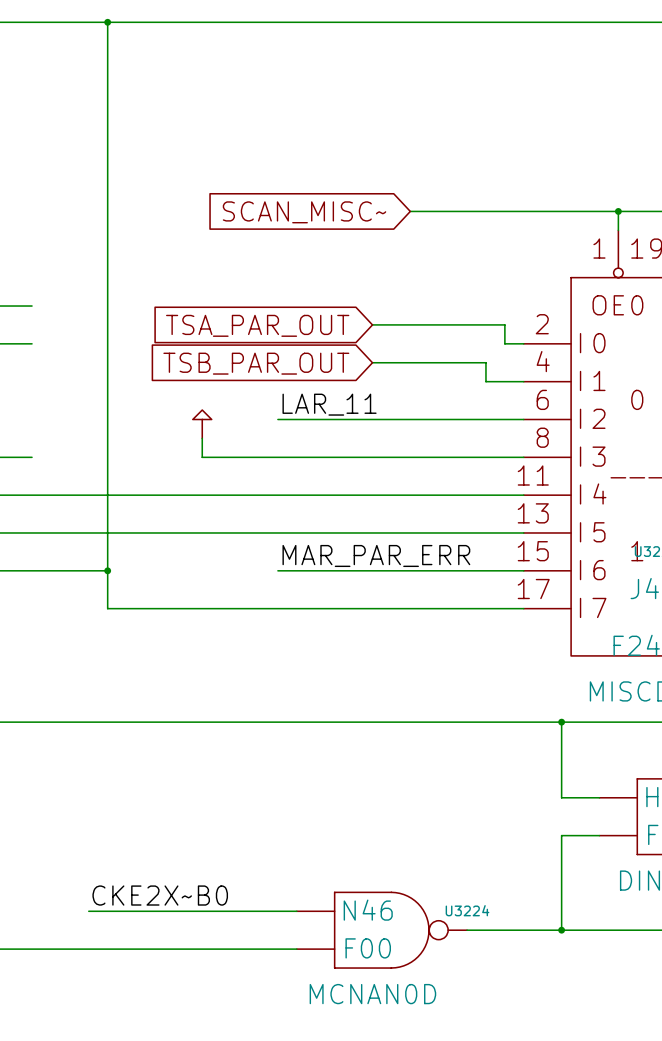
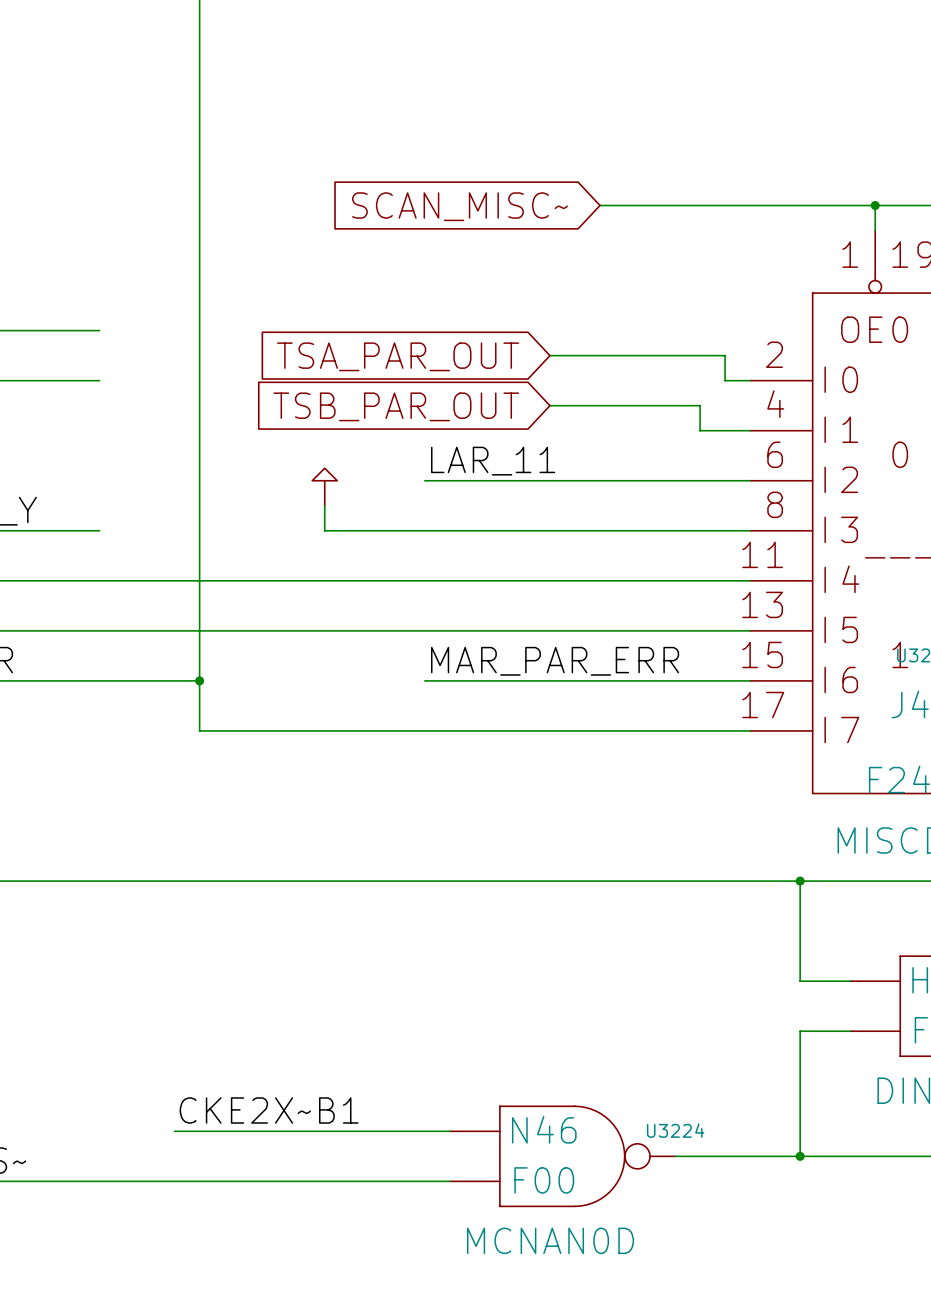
label: CKE2X~B0 (160, 895) -> CKE2X~B1 (269, 1110)

